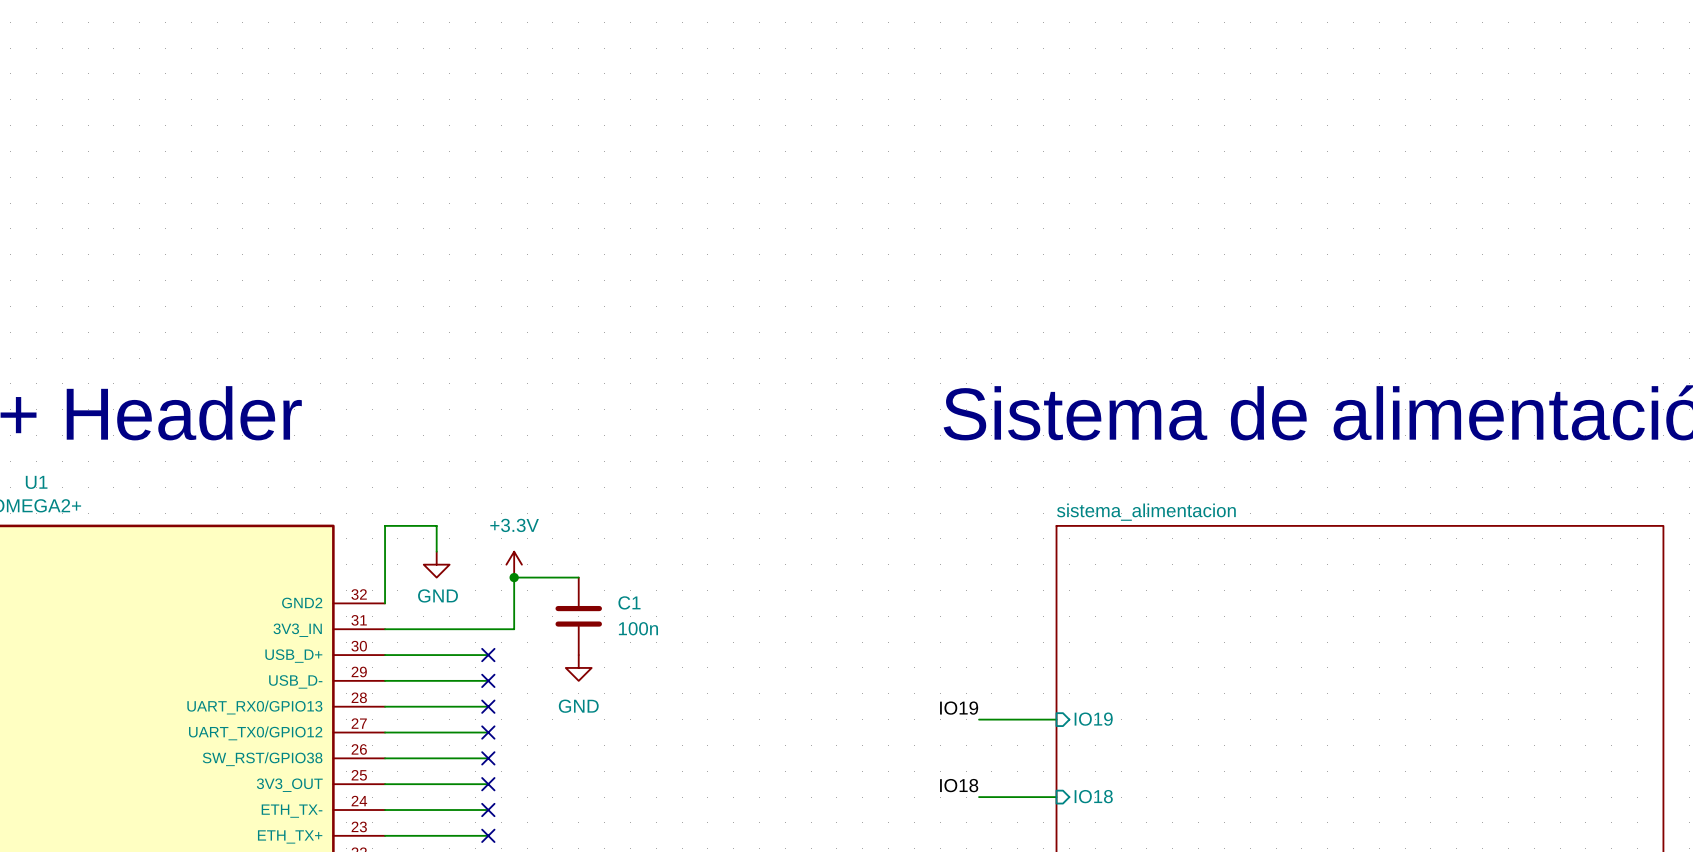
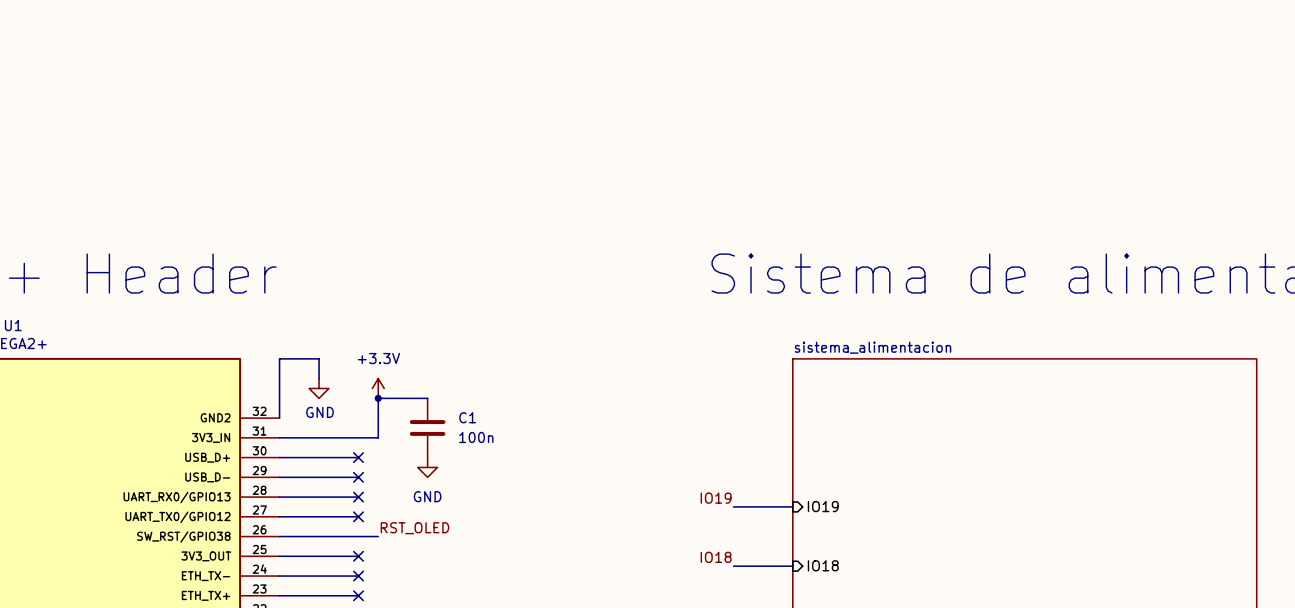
label: none -> RST_OLED (414, 528)
wire: none -> (358, 536) (378, 536)
no-connect mark: (488, 758) -> none

